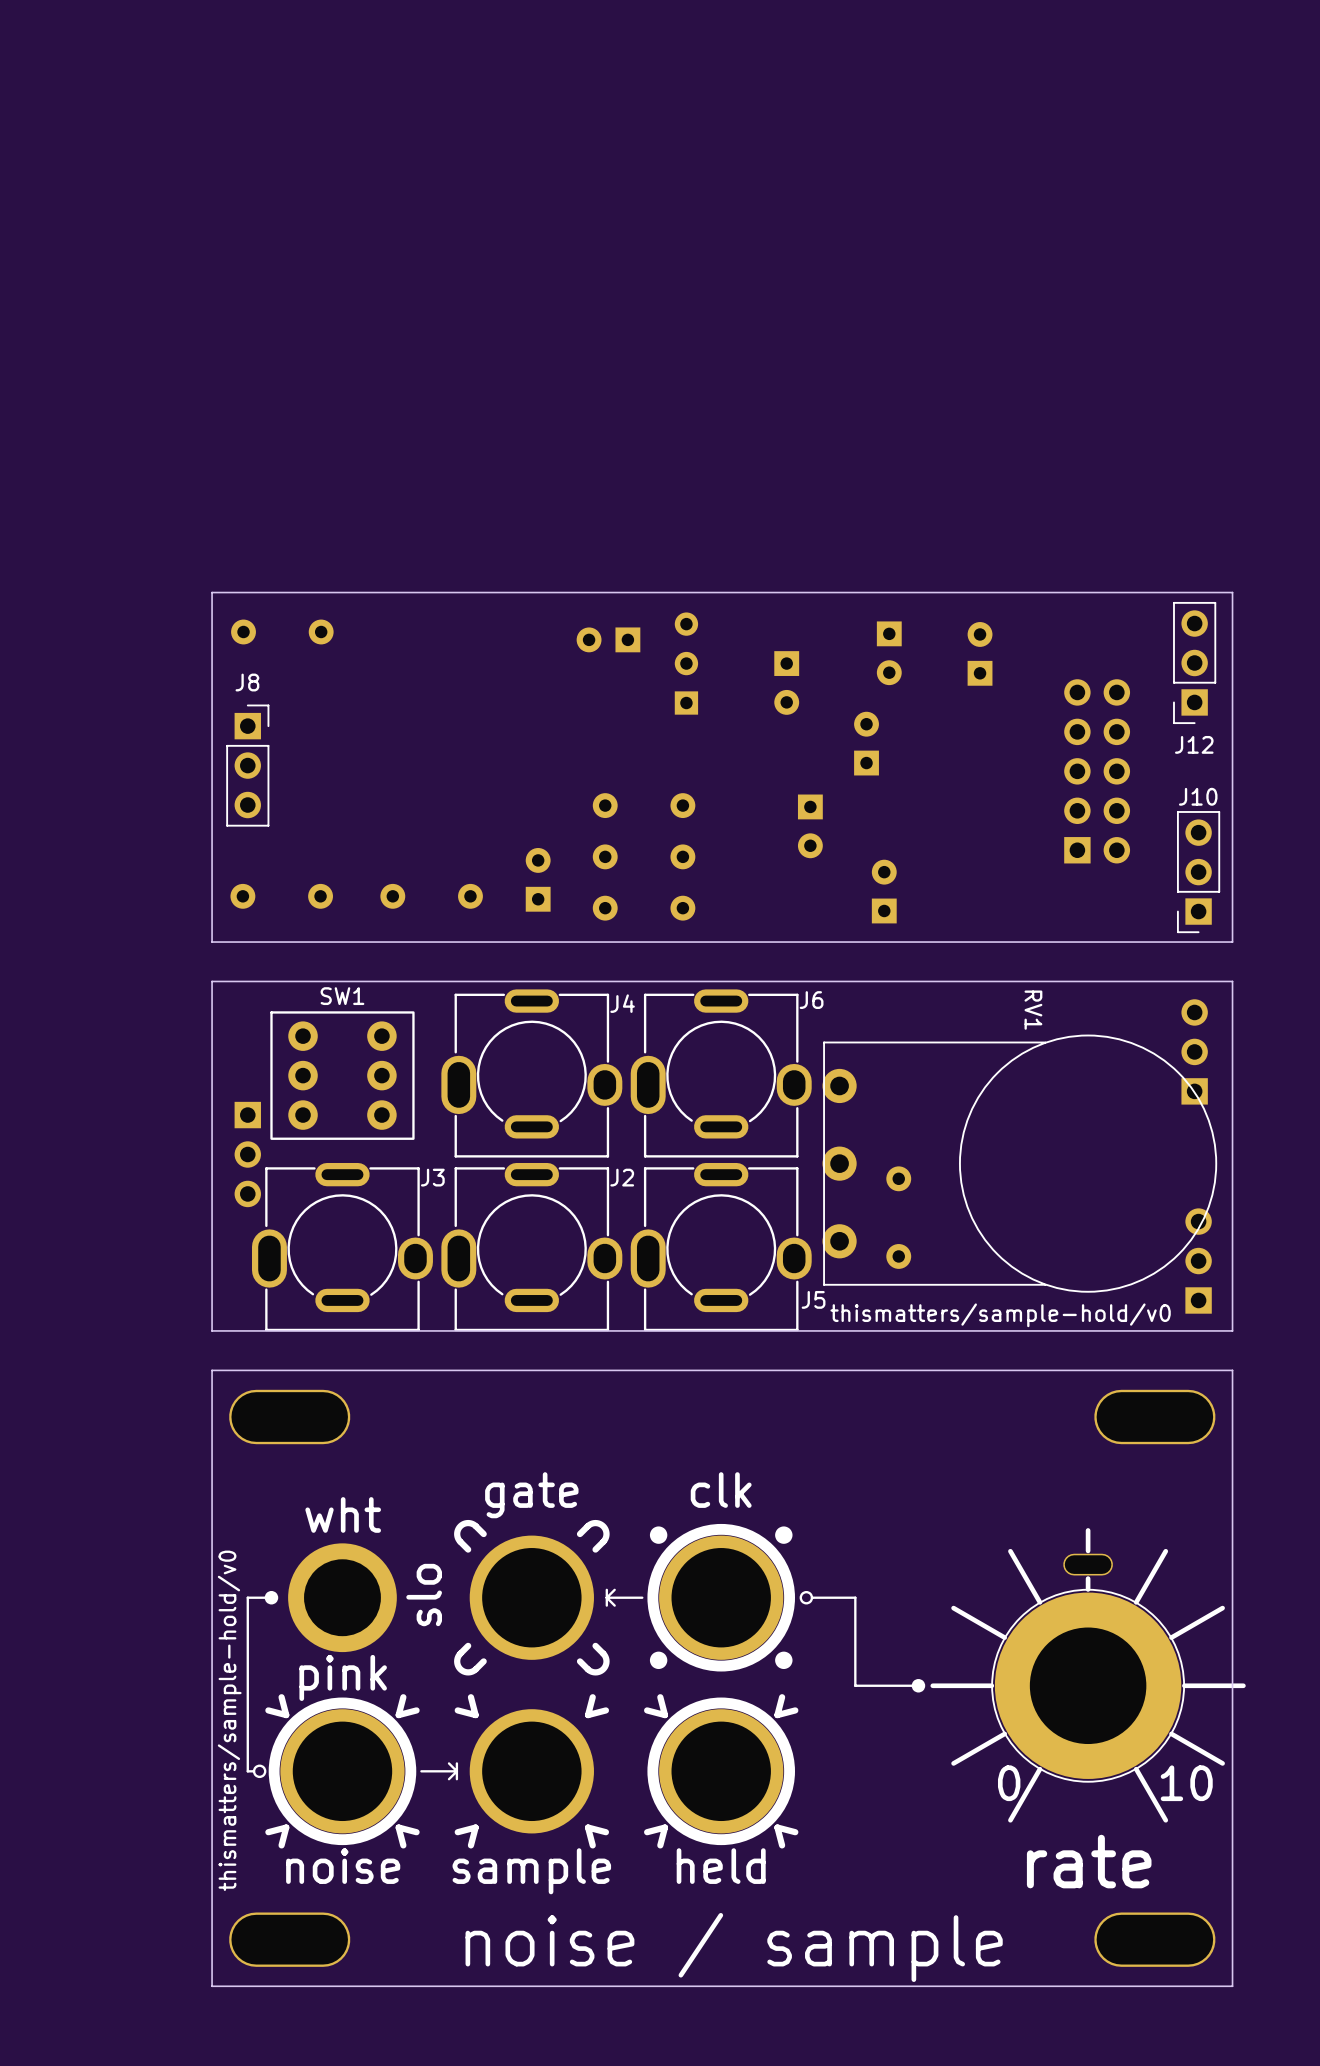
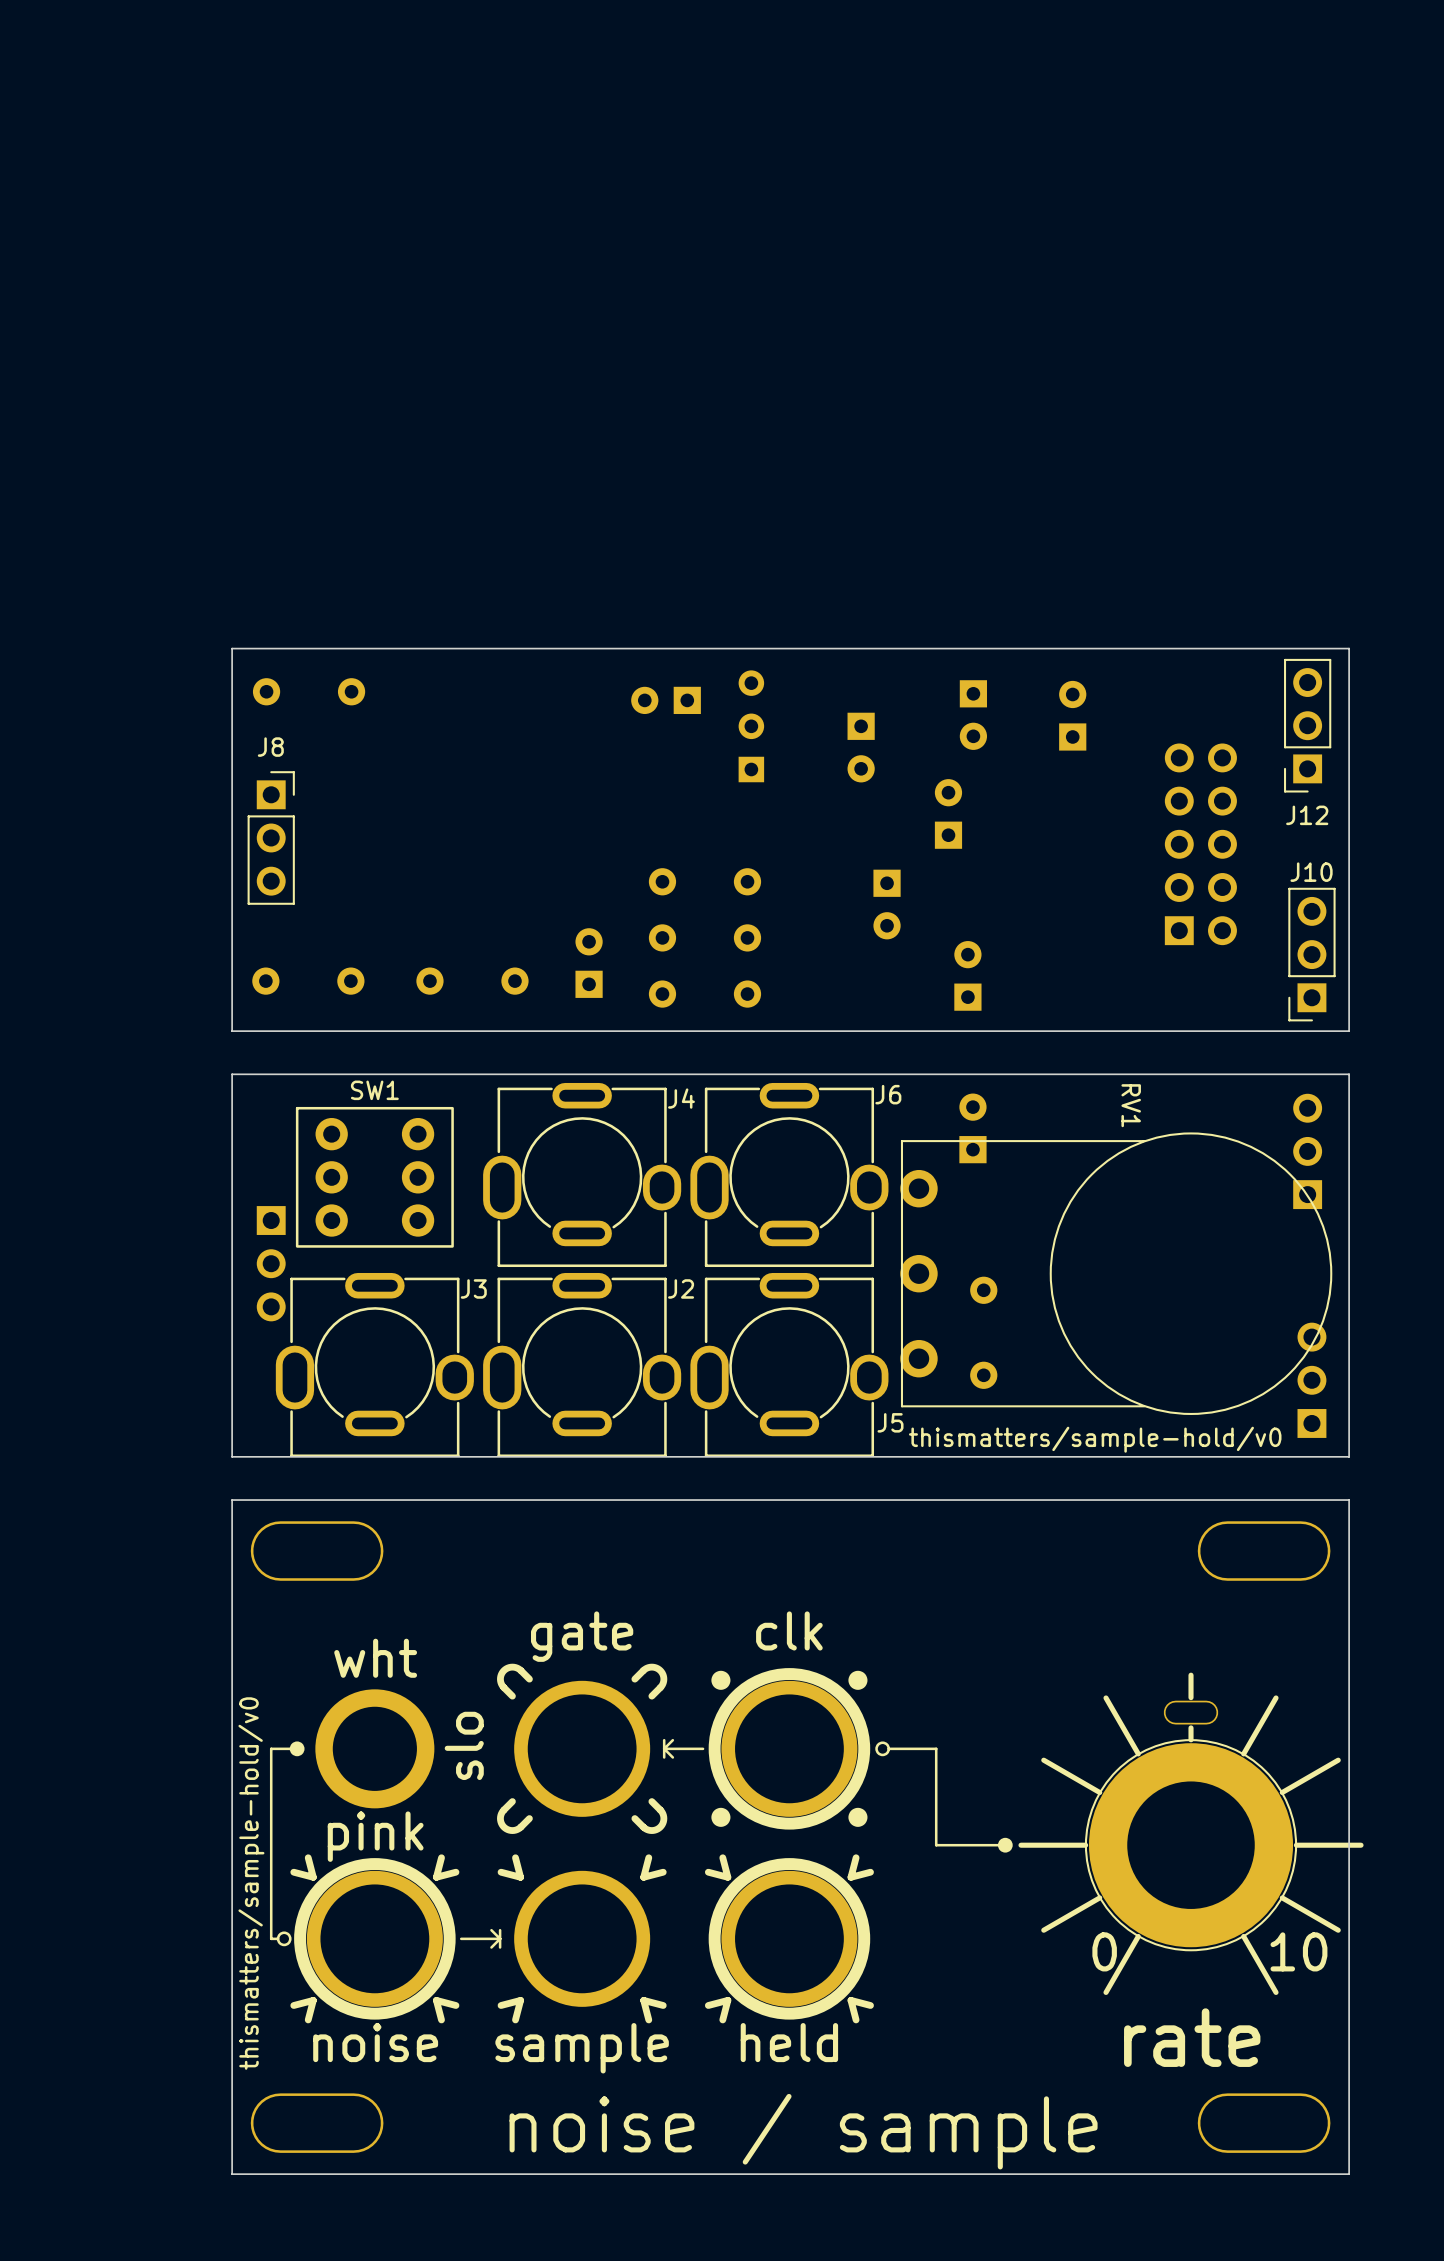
part: none -> (972, 1128)

